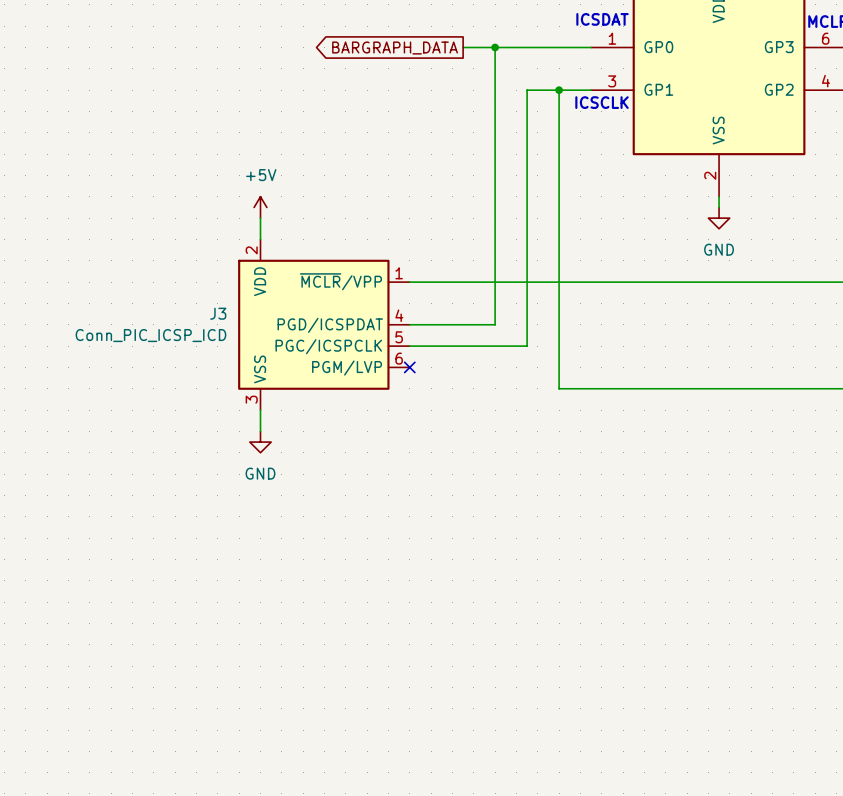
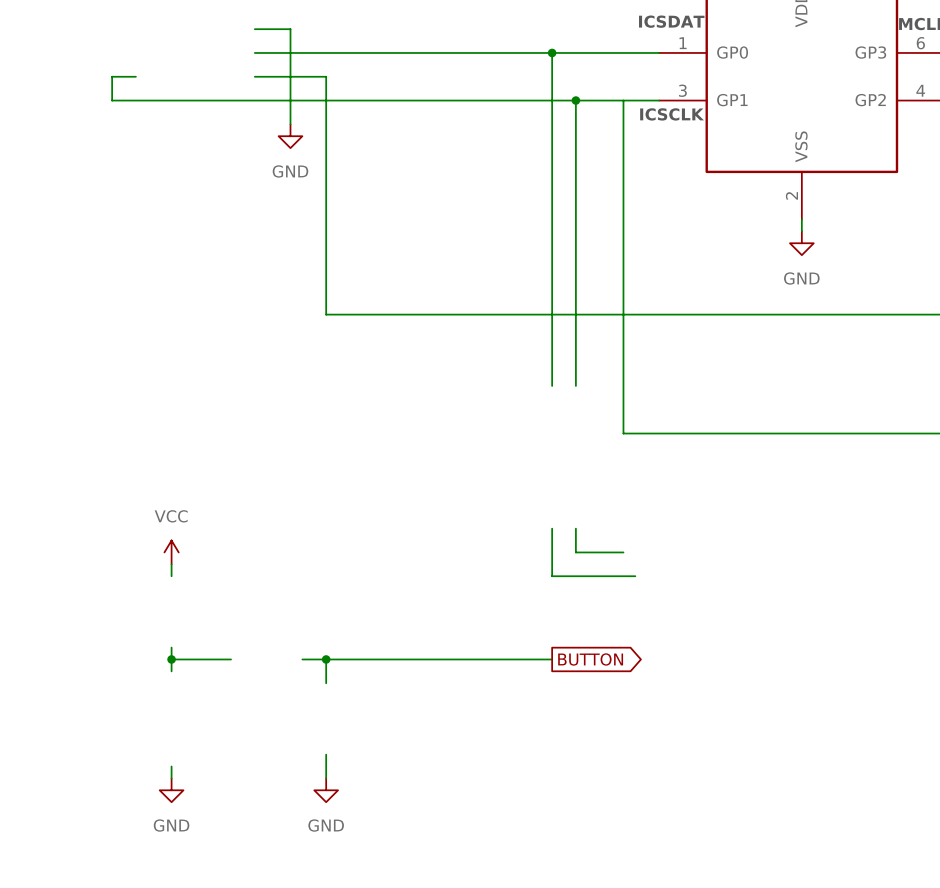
wire: none -> (254, 29) (290, 29) (290, 124)
wire: none -> (254, 52) (516, 52)
global label: BARGRAPH_DATA (395, 48) -> none
wire: none -> (254, 76) (326, 76) (326, 314) (456, 314)
wire: none -> (575, 100) (575, 385)
wire: (527, 90) (527, 346) (409, 346) -> (587, 100) (112, 100) (112, 76) (135, 76)
junction position: (559, 90) -> (575, 100)
power symbol: none -> GND (290, 136)
power symbol: +5V (260, 207) -> none
wire: (260, 218) (260, 239) -> none
J3: Conn_PIC_ICSP_ICD (323, 324) -> none
wire: (409, 324) (495, 324) -> (552, 385) (552, 362)
no-connect mark: (409, 367) -> none
wire: (260, 410) (260, 431) -> (326, 659) (326, 683)
power symbol: GND (260, 442) -> none
wire: none -> (552, 528) (552, 576) (635, 576)
wire: none -> (575, 528) (575, 552) (623, 552)
power symbol: none -> VCC (171, 552)
wire: none -> (171, 564) (171, 576)
wire: none -> (171, 647) (171, 671)
wire: none -> (171, 659) (231, 659)
junction: none -> (171, 659)
wire: none -> (302, 659) (552, 659)
junction: none -> (326, 659)
global label: none -> BUTTON (590, 659)
wire: none -> (326, 754) (326, 778)
wire: none -> (171, 766) (171, 778)
power symbol: none -> GND (171, 790)
power symbol: none -> GND (326, 790)

